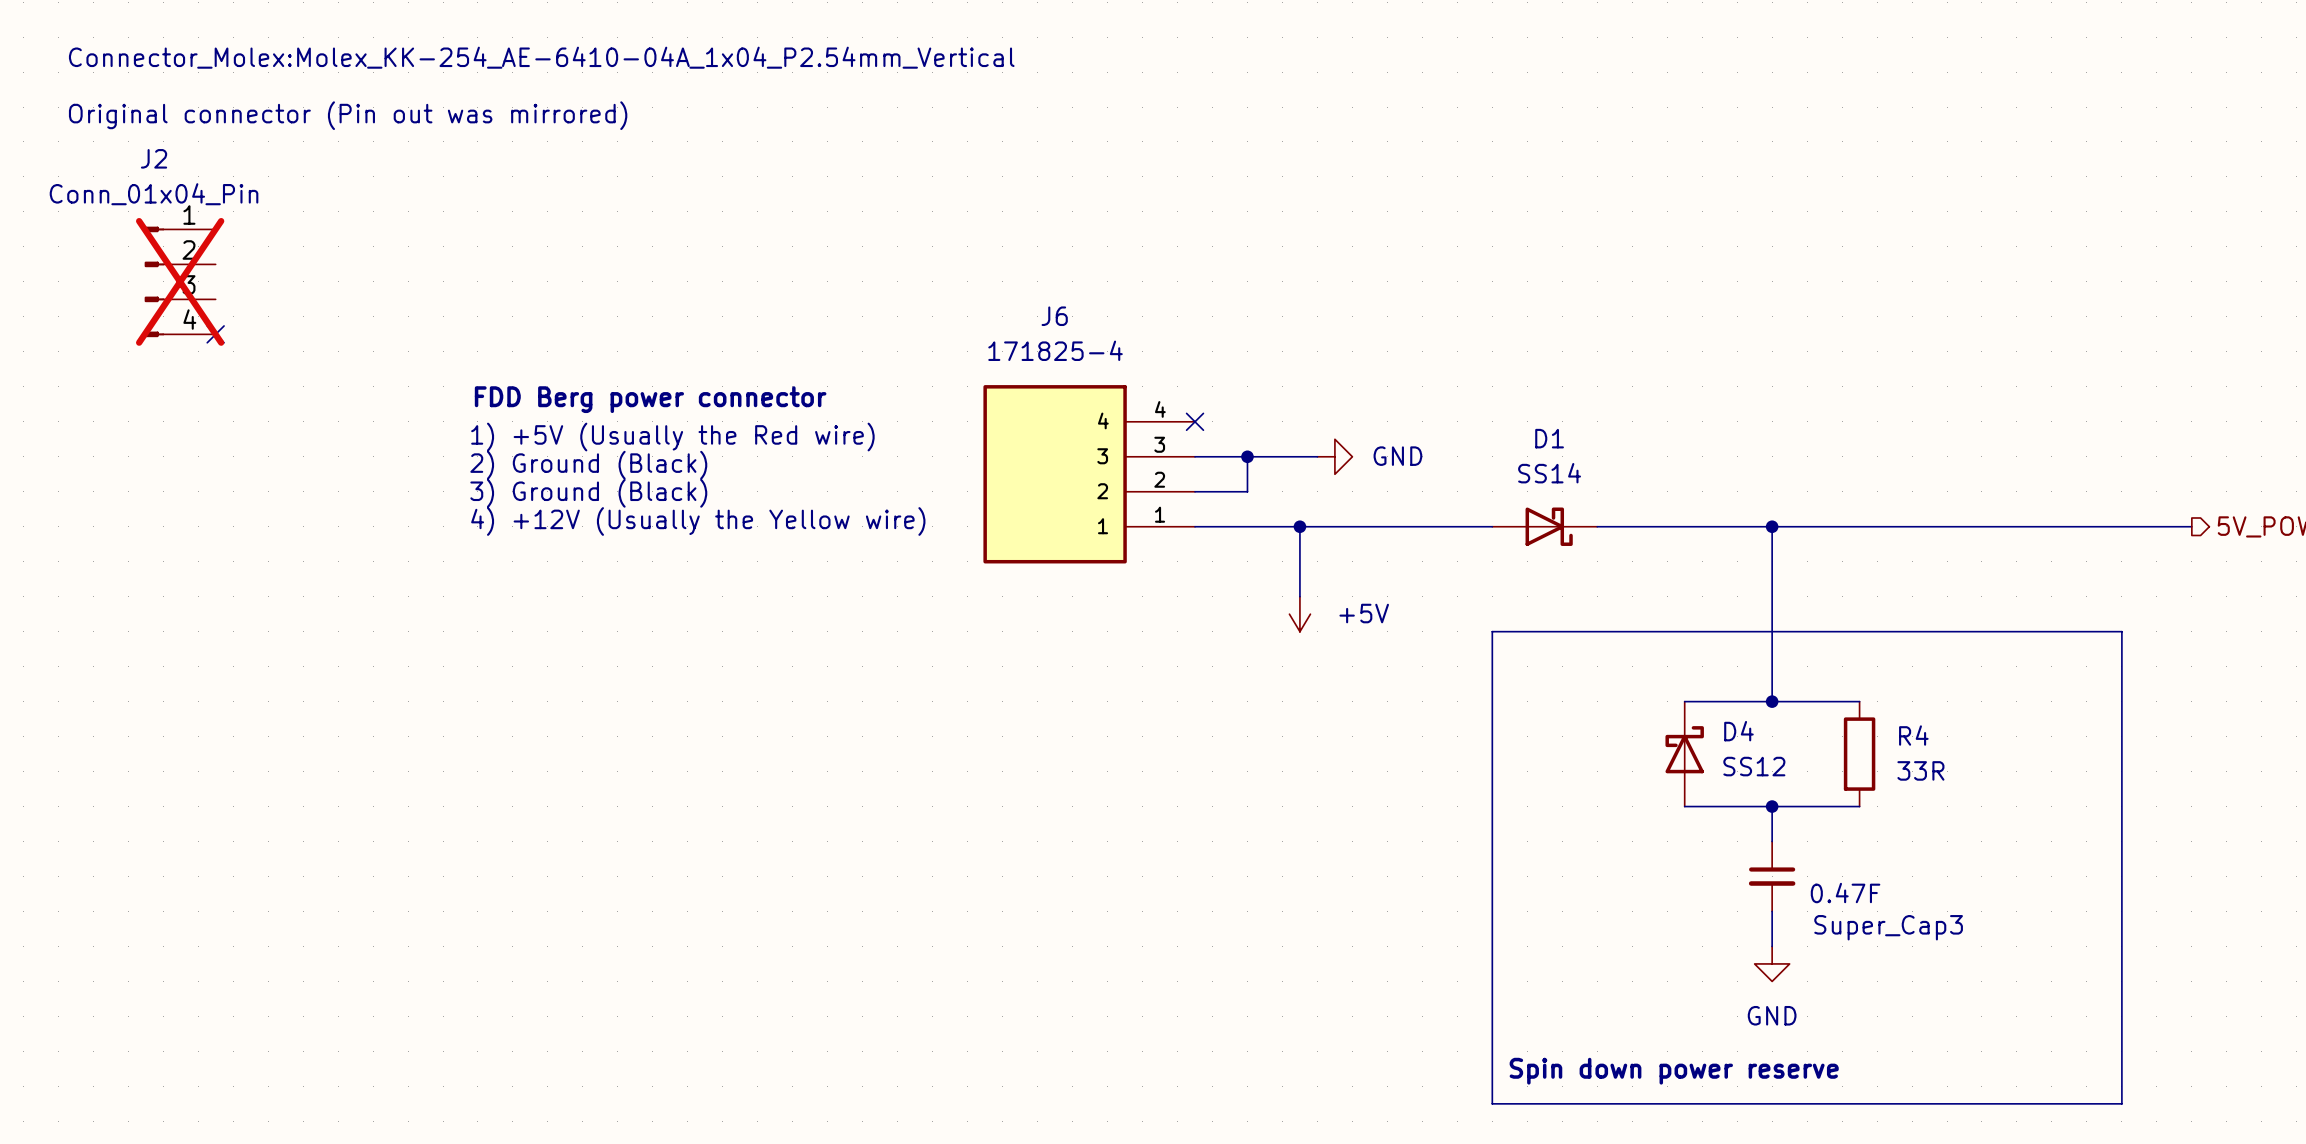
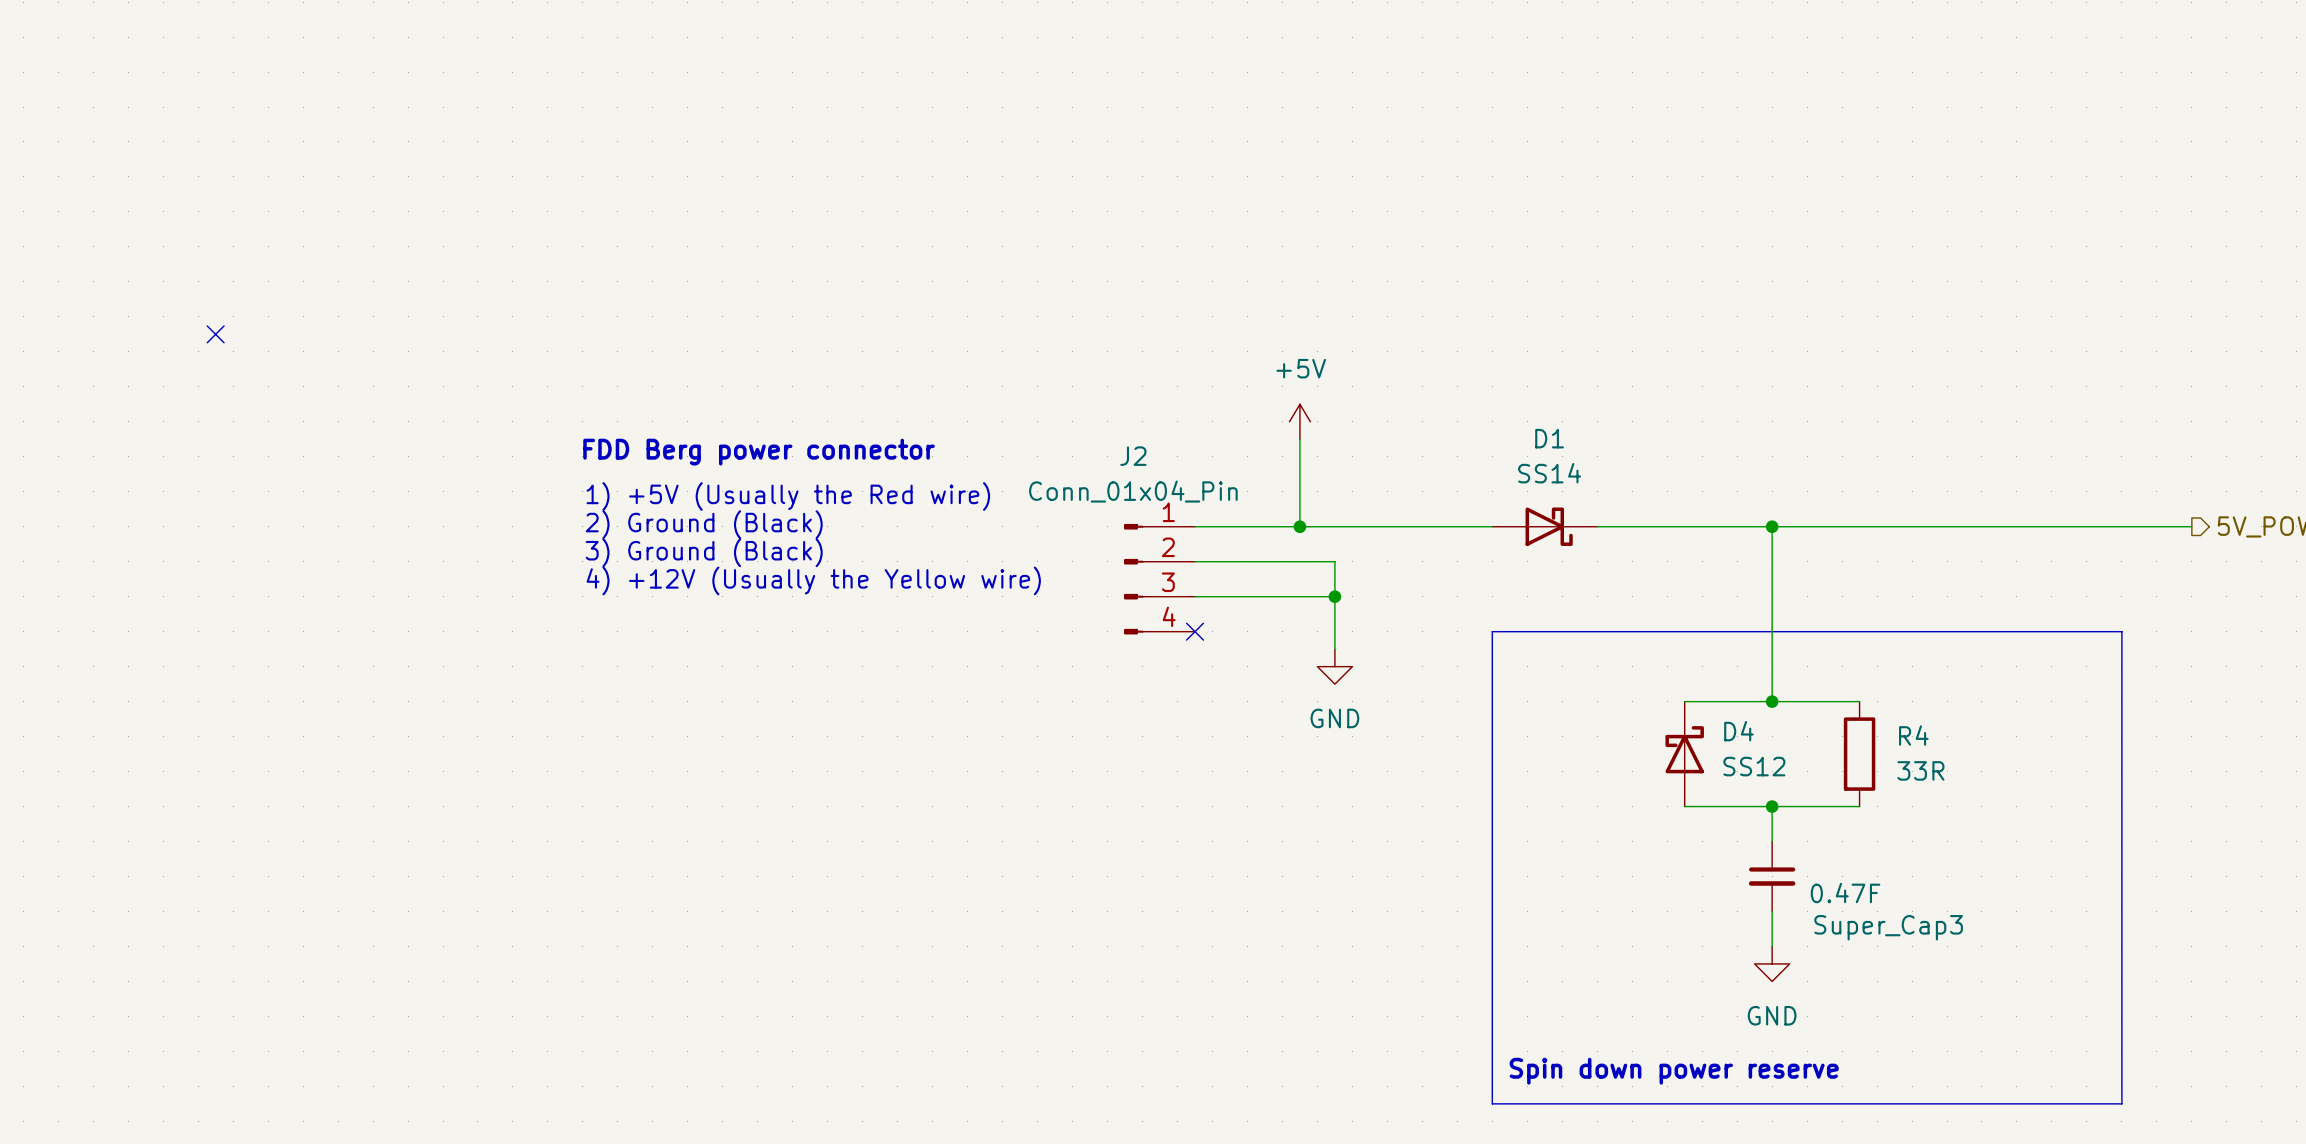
text: Connector_Molex:Molex_KK-254_AE-6410-04A_1x04_P2.54mm_Vertical (541, 57) -> none
text: Original connector (Pin out was mirrored) (348, 115) -> none
J2 position: (180, 281) -> (1159, 579)
J2 do-not-place cross: (180, 281) -> none
text position: FDD Berg power connector (650, 399) -> FDD Berg power connector (759, 452)
no-connect mark: (1195, 421) -> none
text position: 1) +5V (Usually the Red wire) (672, 437) -> 1) +5V (Usually the Red wire) (788, 496)
wire: (1195, 456) (1317, 456) -> none
wire: (1247, 456) (1247, 491) (1195, 491) -> none
junction: (1247, 456) -> none
power symbol rotation: 0° (1334, 456) -> 90° clockwise (1334, 666)
power symbol position: GND (1334, 456) -> GND (1334, 666)
text position: 2) Ground (Black) (588, 465) -> 2) Ground (Black) (704, 524)
J6: 171825-4 (1089, 474) -> none
text position: 3) Ground (Black) (588, 493) -> 3) Ground (Black) (704, 552)
text position: 4) +12V (Usually the Yellow wire) (698, 521) -> 4) +12V (Usually the Yellow wire) (813, 580)
wire: (1299, 526) (1299, 596) -> (1299, 526) (1299, 439)
wire: none -> (1195, 561) (1334, 561) (1334, 649)
wire: none -> (1195, 596) (1334, 596)
junction: none -> (1334, 596)
power symbol text position: +5V (1364, 613) -> +5V (1301, 368)
power symbol rotation: 0° (1299, 614) -> 180° (1299, 421)
power symbol position: +5V (1299, 614) -> +5V (1299, 421)
no-connect mark: none -> (1195, 631)

